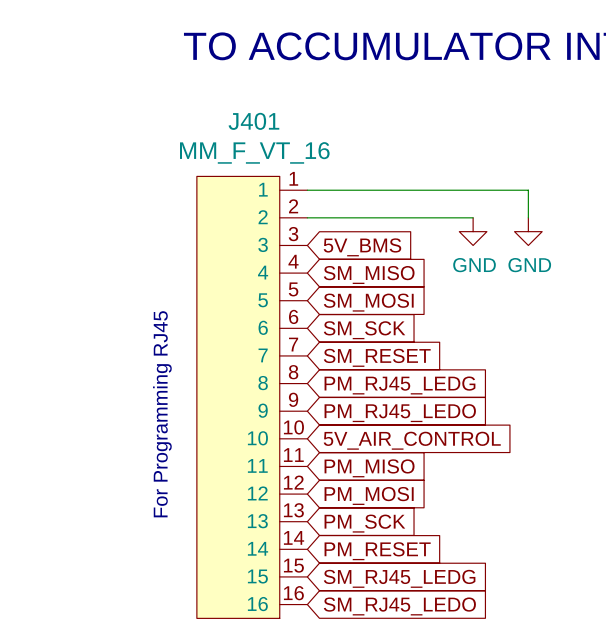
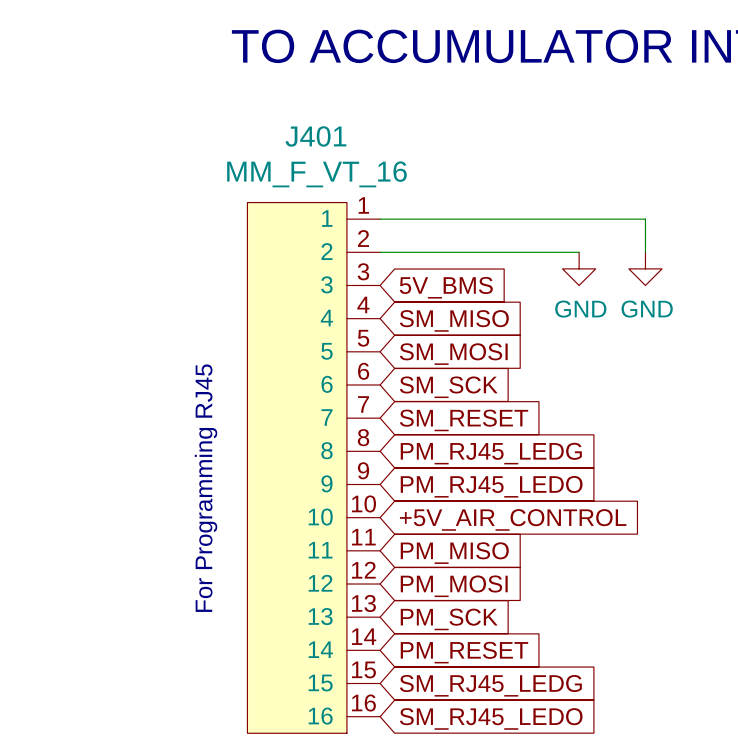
global label: 5V_AIR_CONTROL (412, 440) -> +5V_AIR_CONTROL (513, 519)

